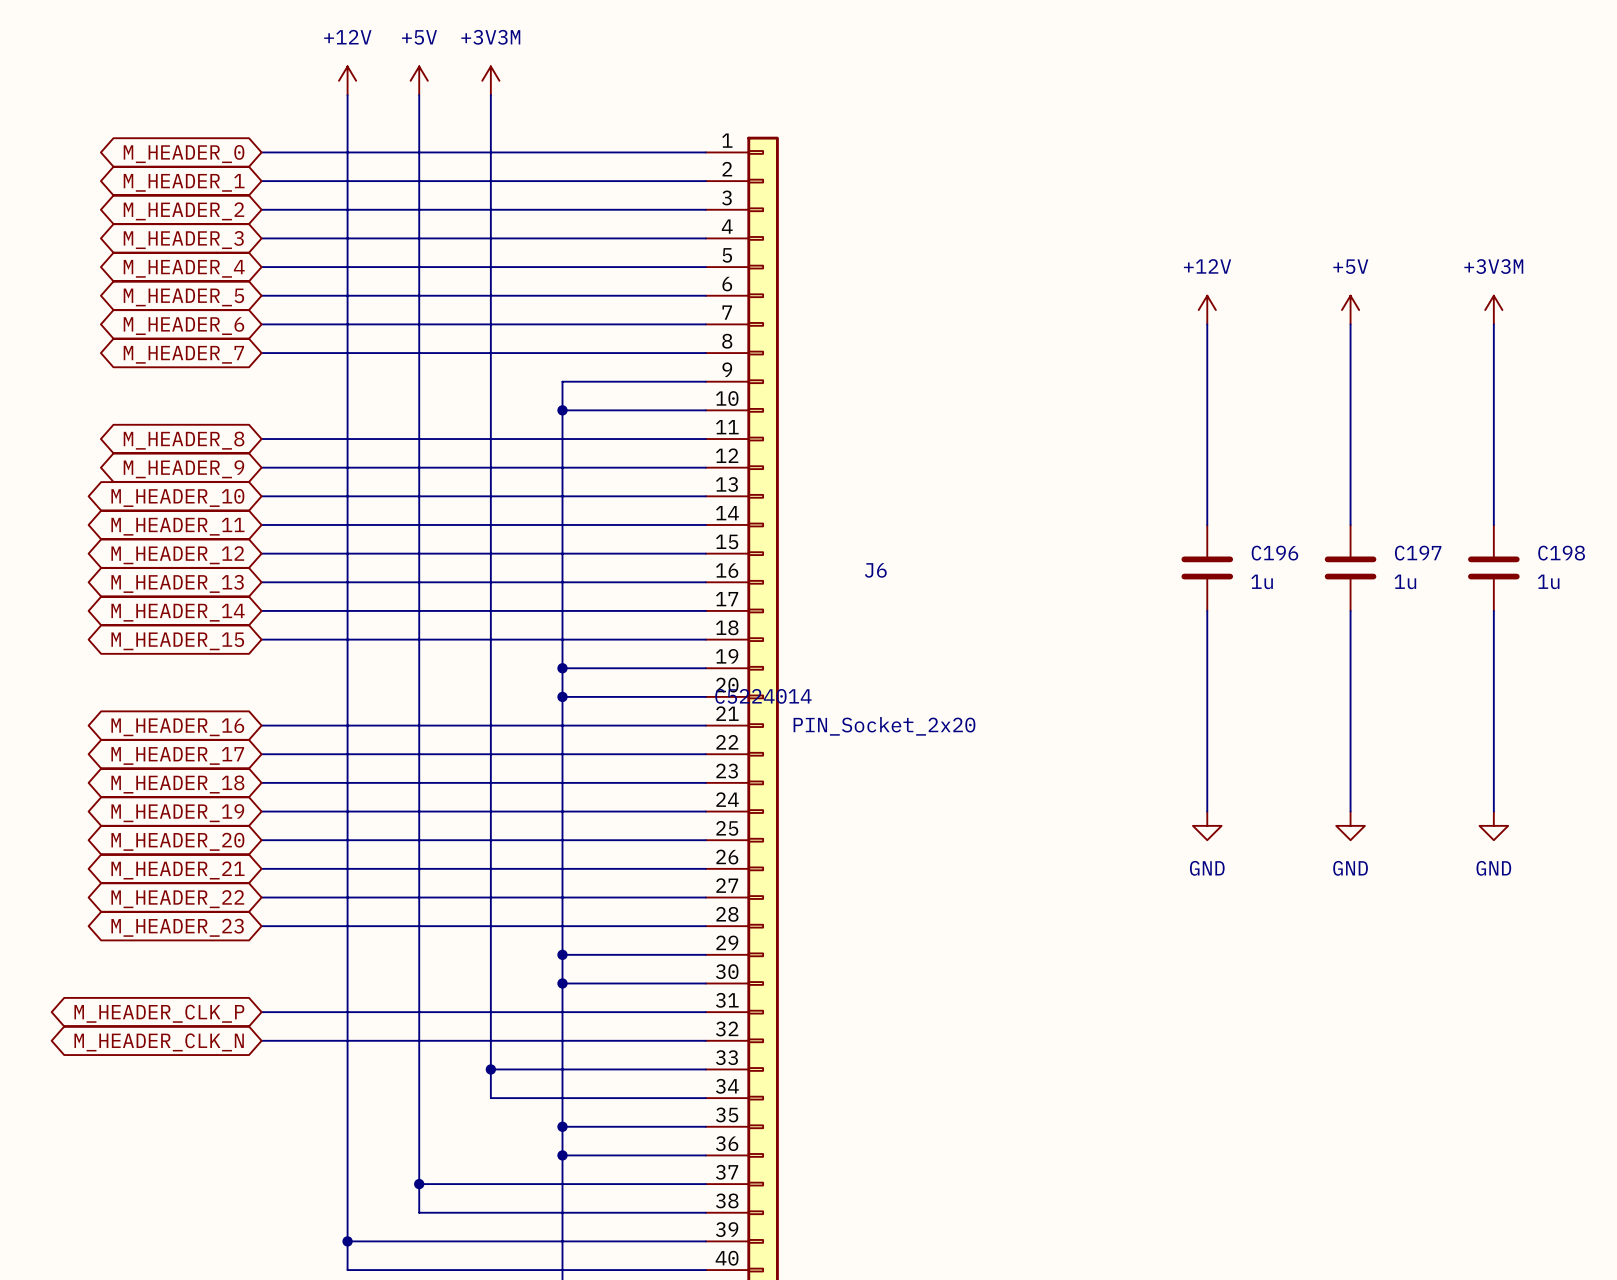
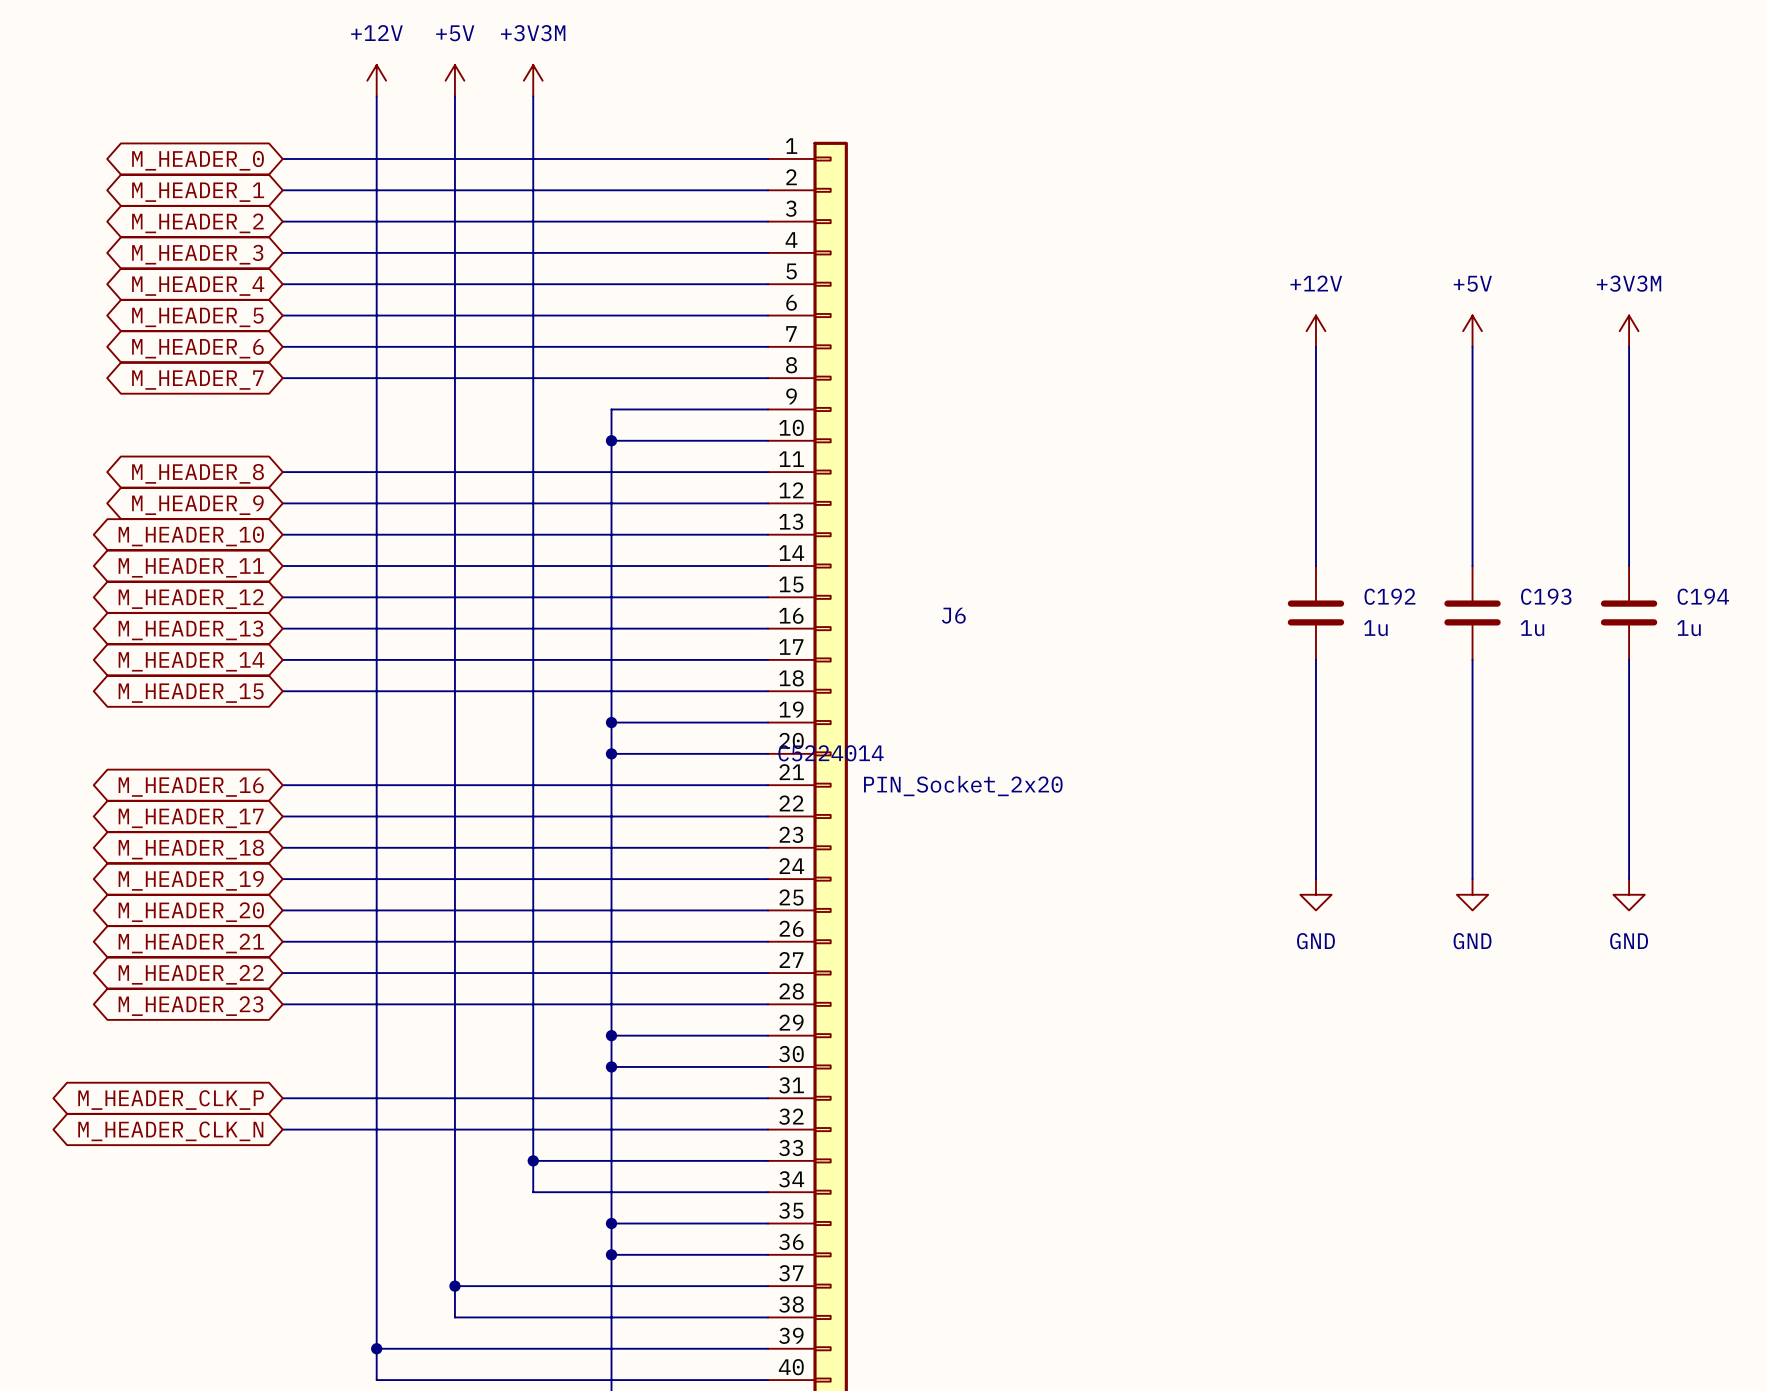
C196 name: C196 (1274, 553) -> C192 (1389, 596)
C197 name: C197 (1418, 553) -> C193 (1546, 596)
C198 name: C198 (1561, 553) -> C194 (1703, 596)

